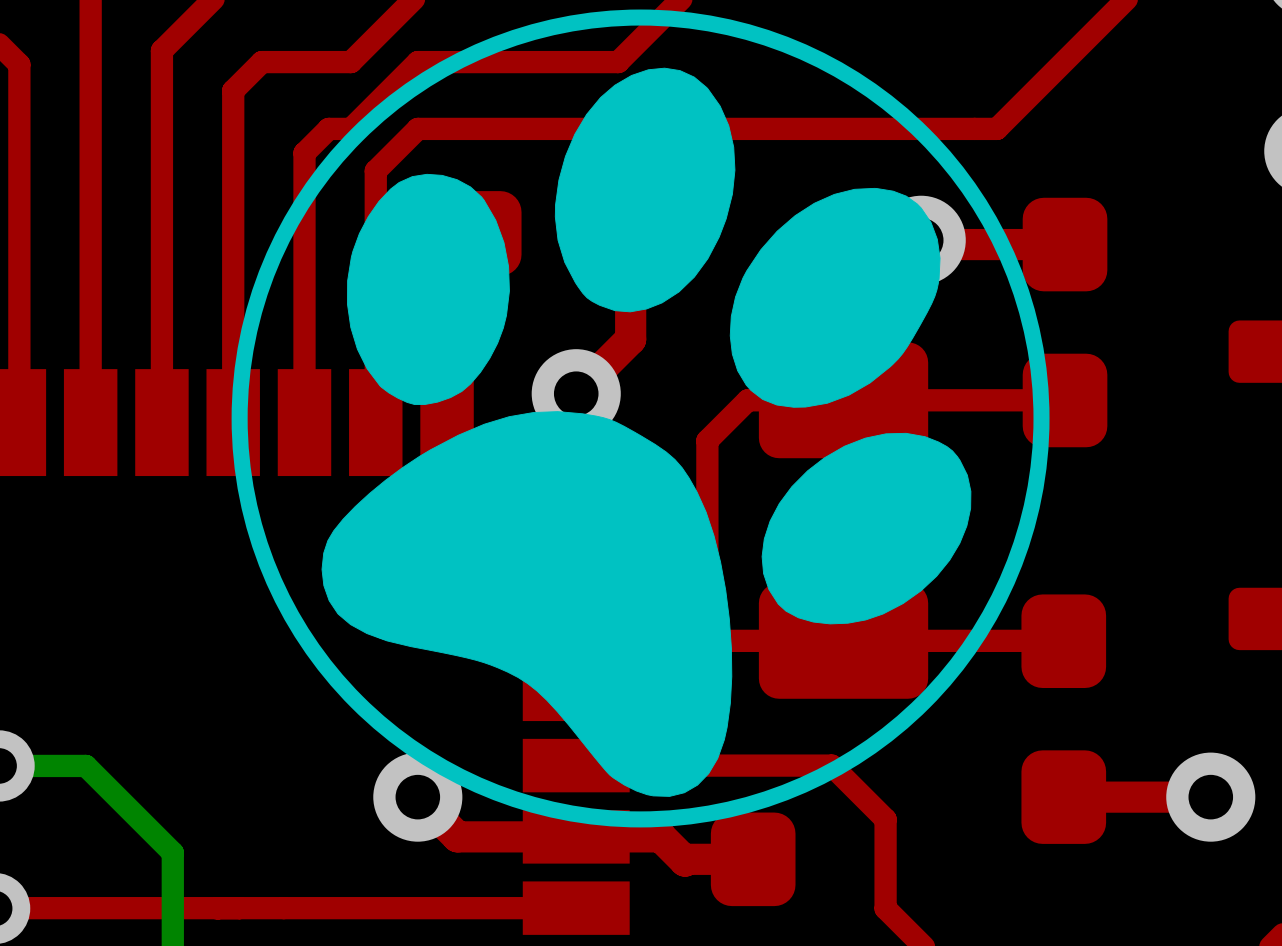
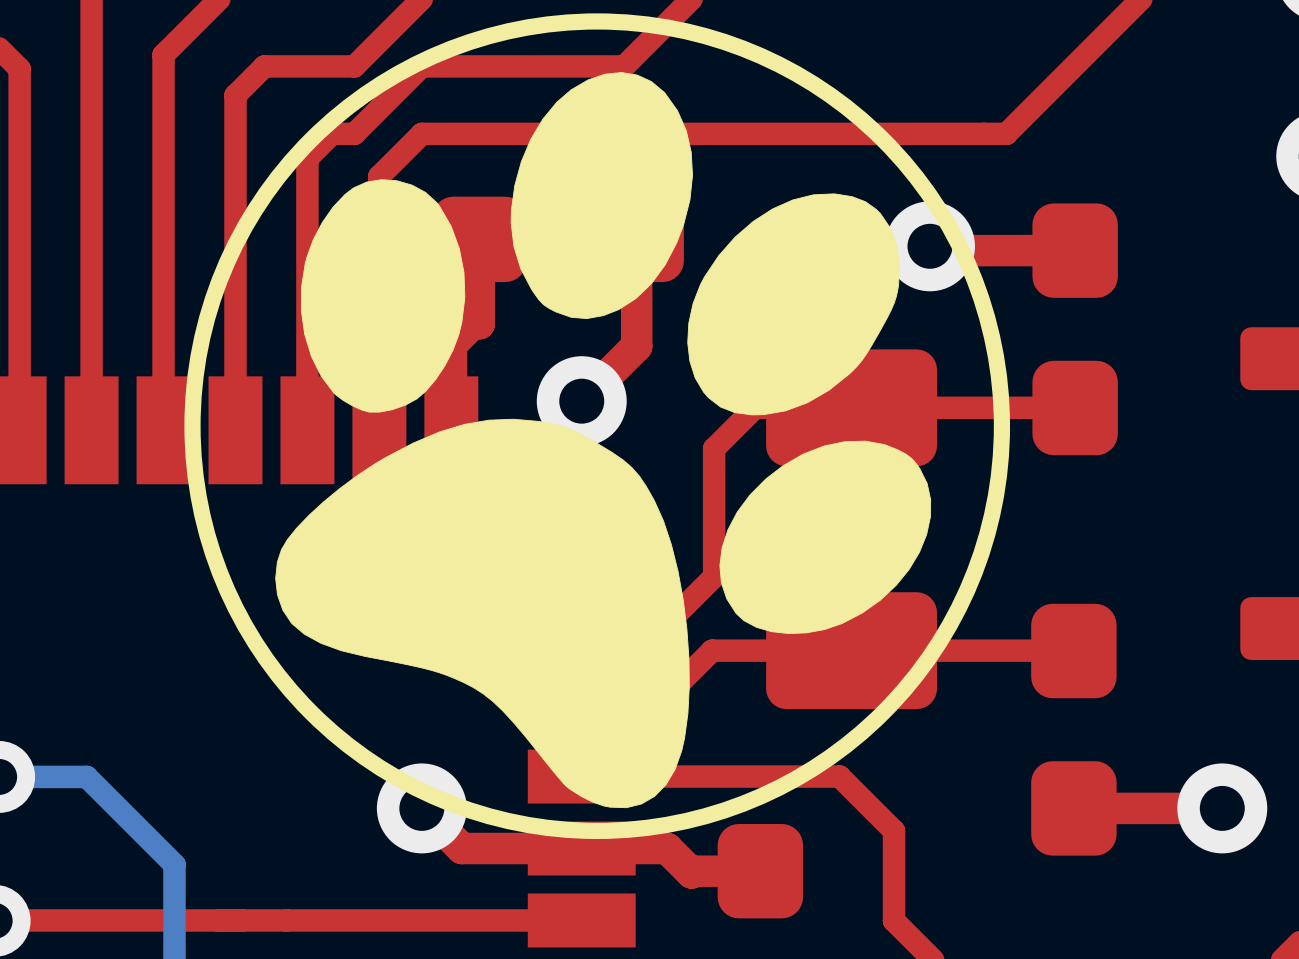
drawing position: (640, 418) -> (597, 426)

